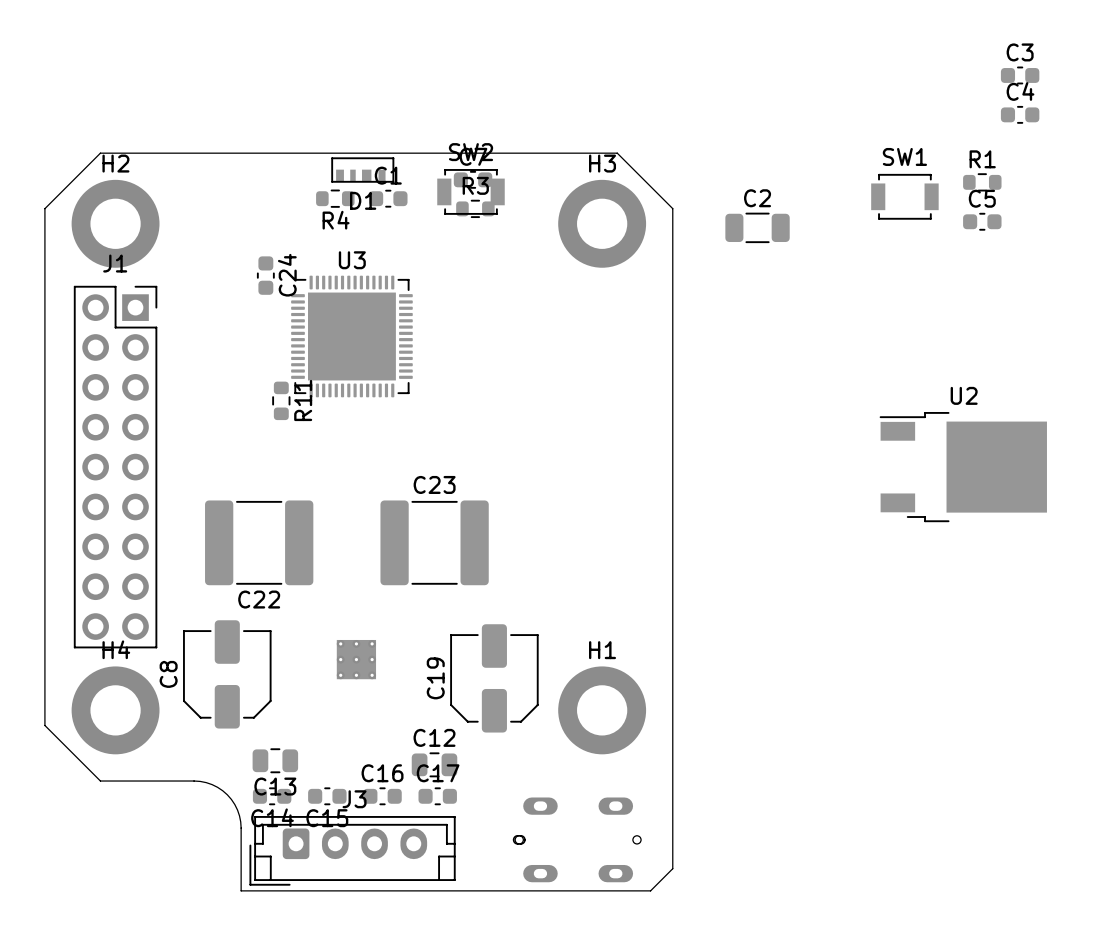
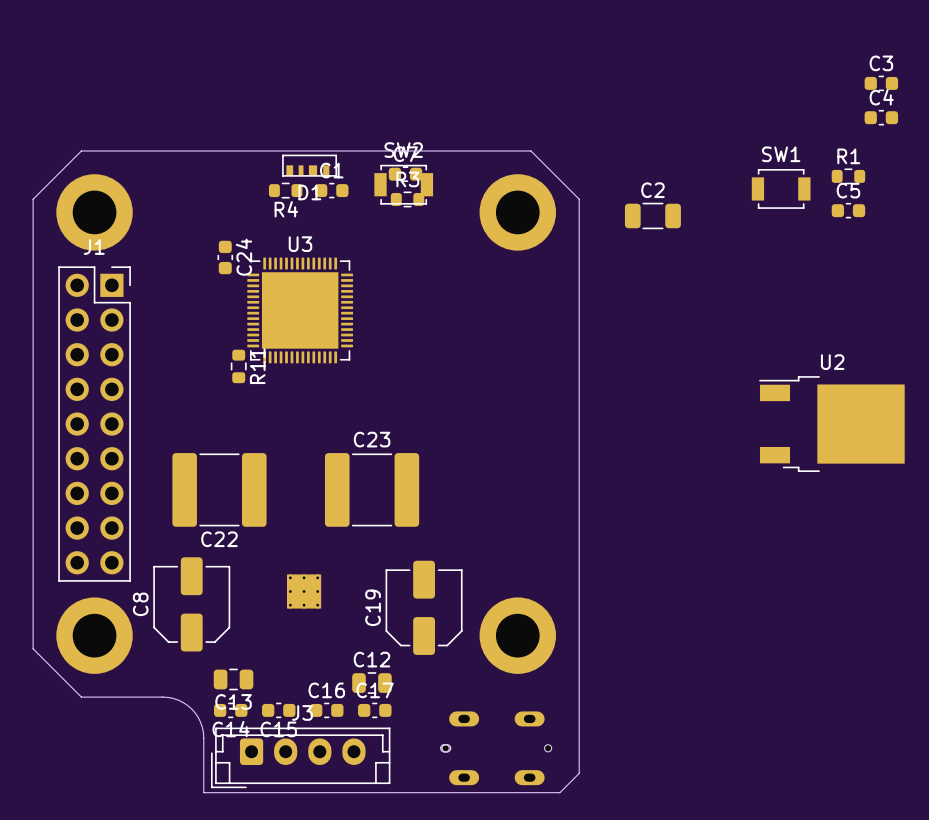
H2 name: H2 (115, 163) -> none
H3 name: H3 (602, 163) -> none
H4 name: H4 (116, 649) -> none
H1 name: H1 (602, 650) -> none

